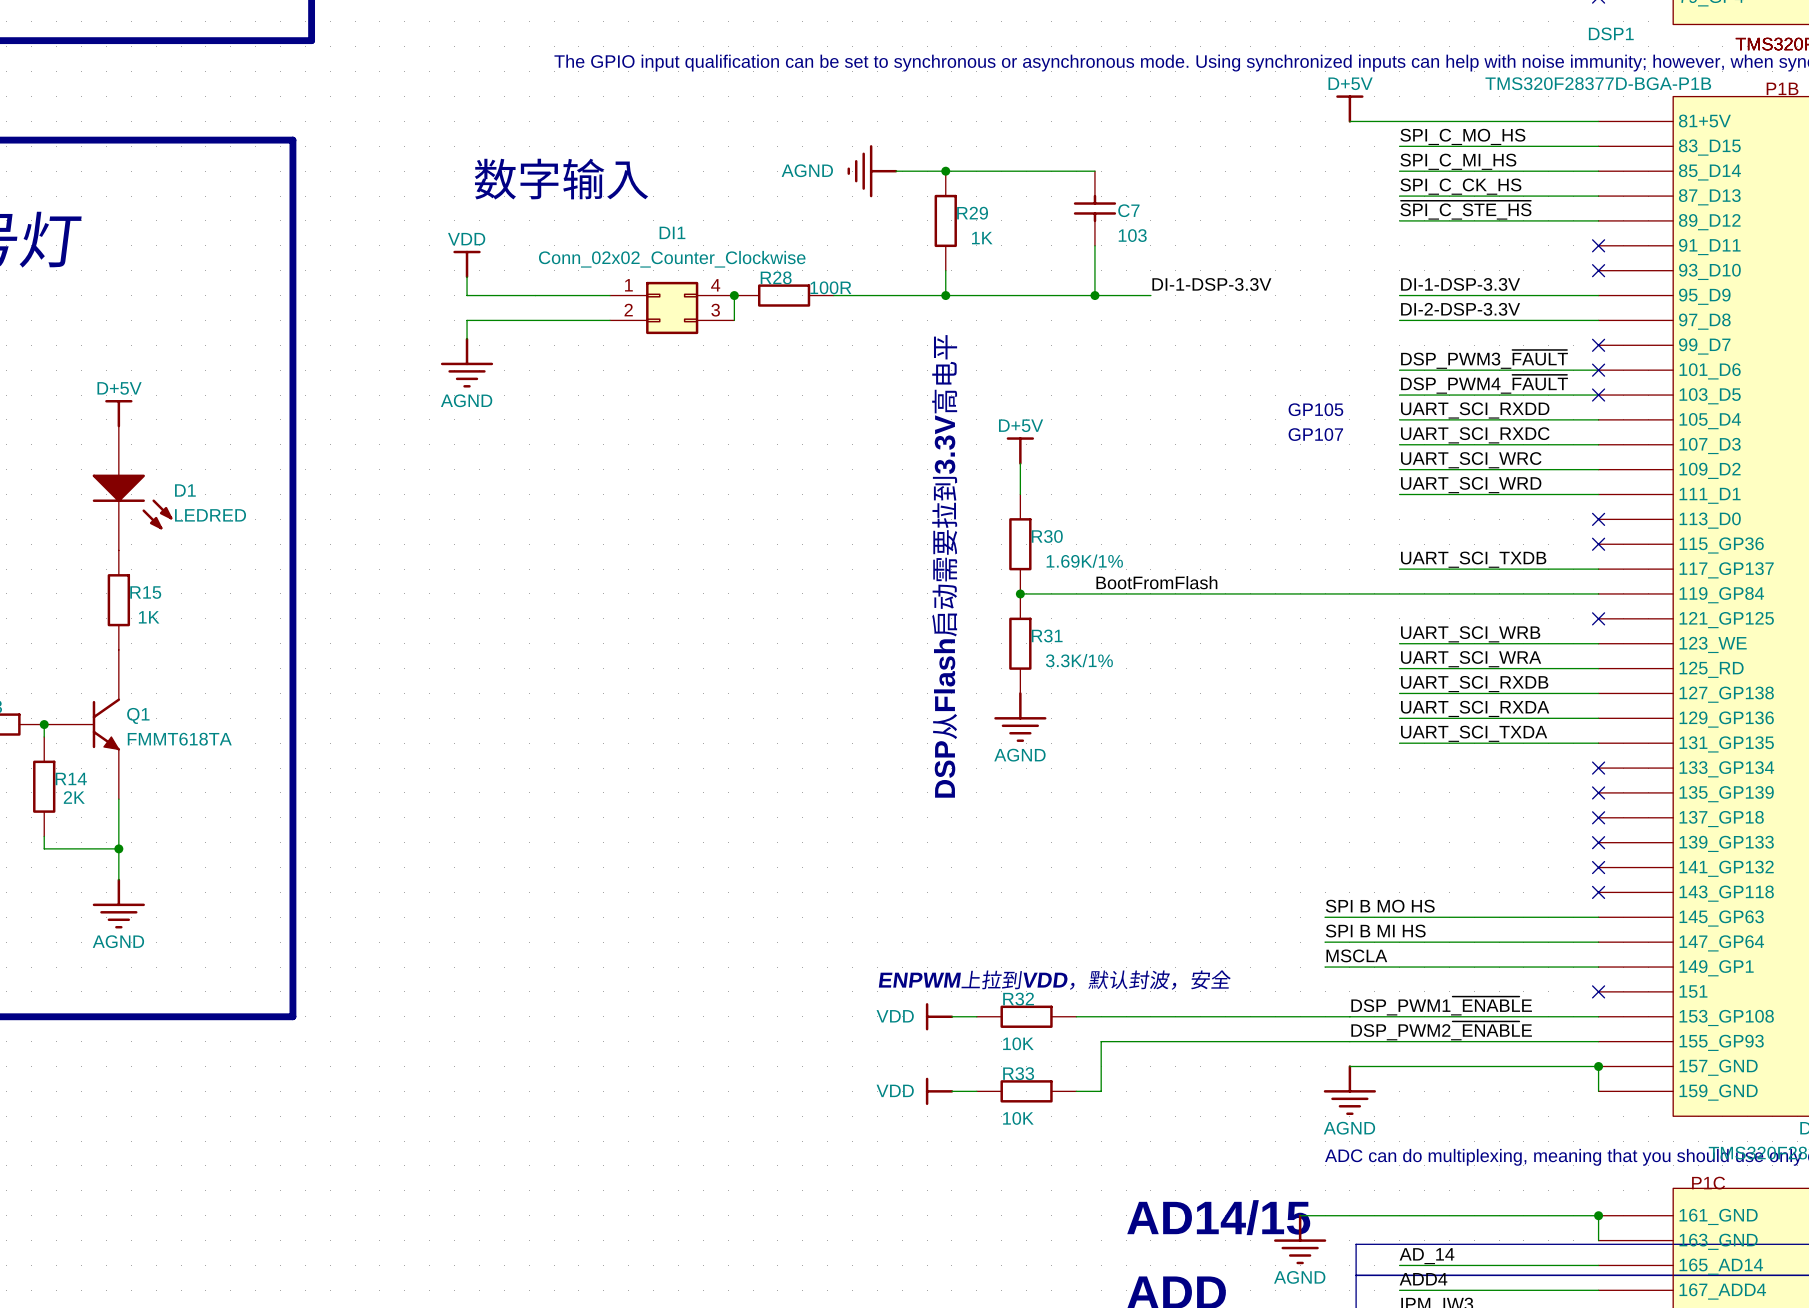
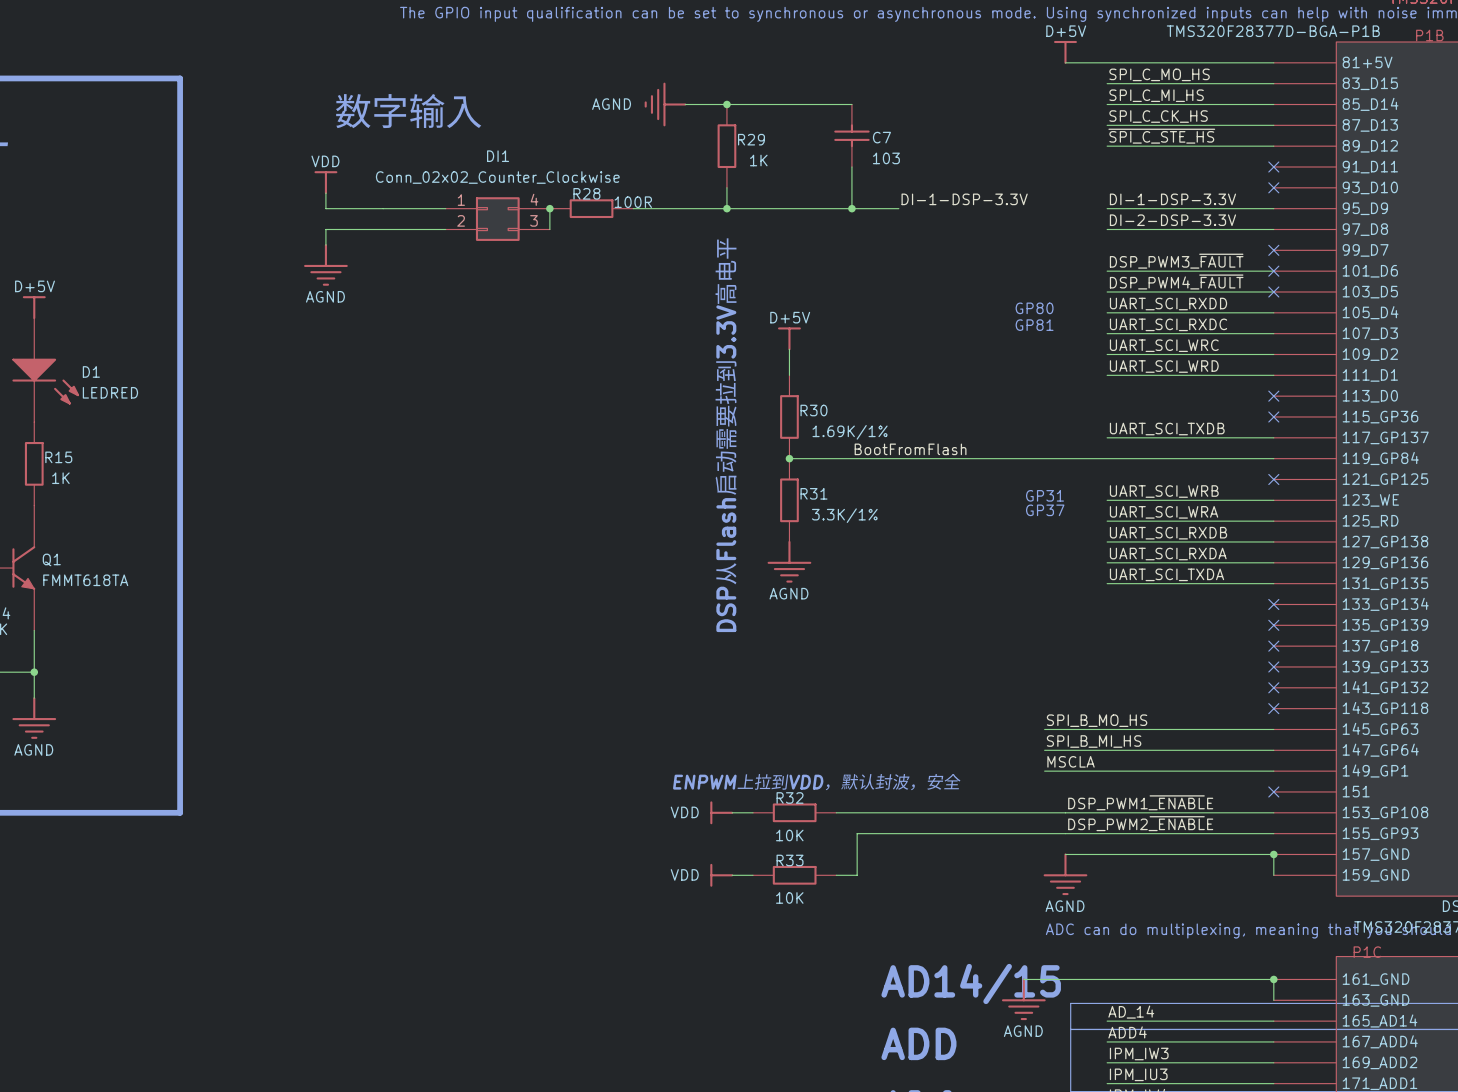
text: GP105 (1315, 409) -> GP80 (1034, 308)
text: GP107 (1315, 434) -> GP81 (1034, 325)
text: none -> GP31 (1044, 495)
text: none -> GP37 (1045, 510)
label: SPI B MO HS (1380, 906) -> SPI_B_MO_HS (1097, 720)
label: SPI B MI HS (1375, 931) -> SPI_B_MI_HS (1094, 741)

